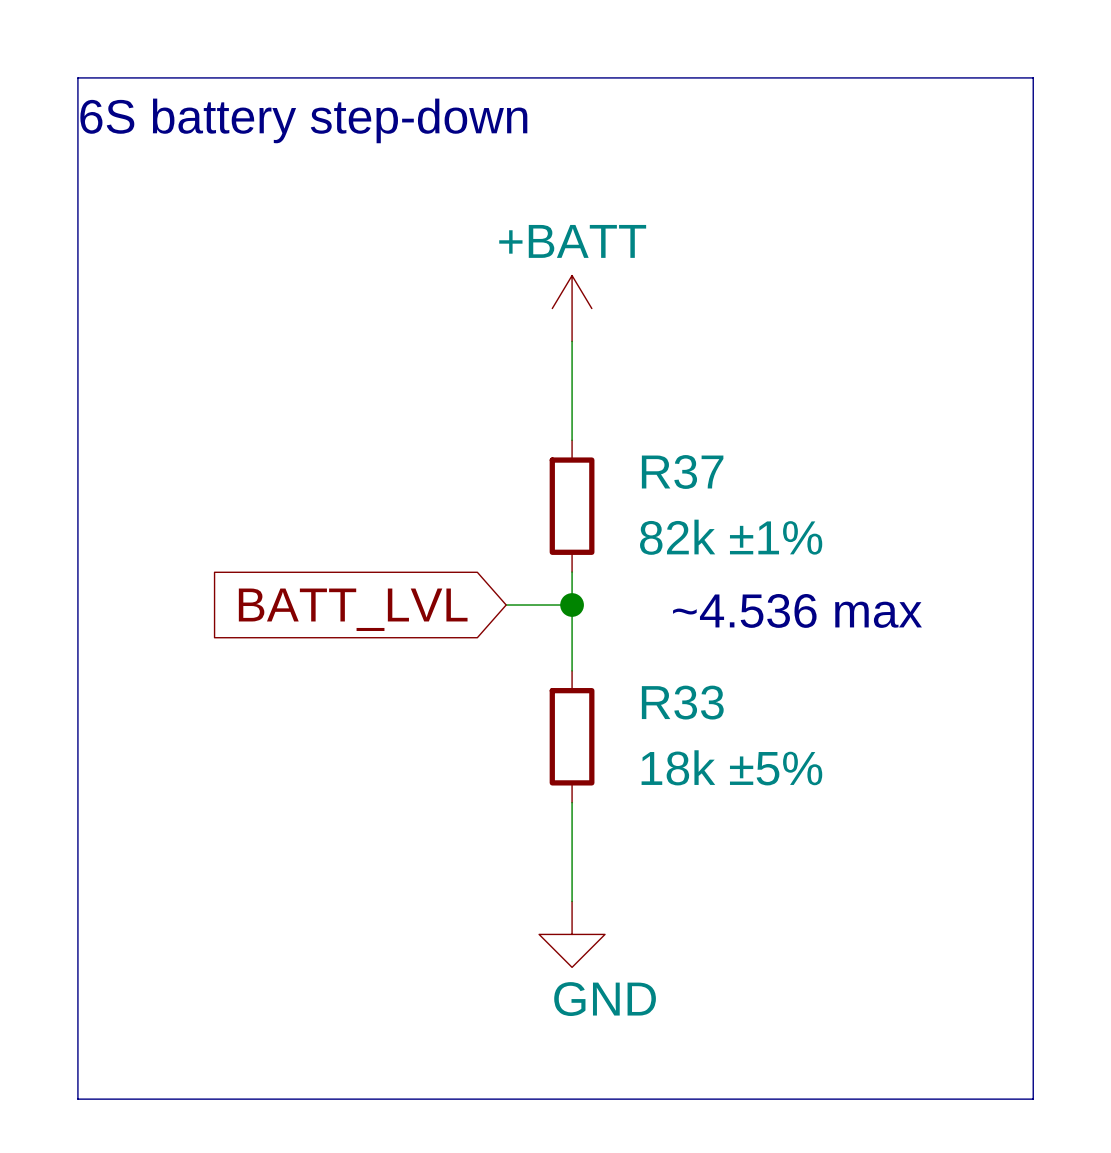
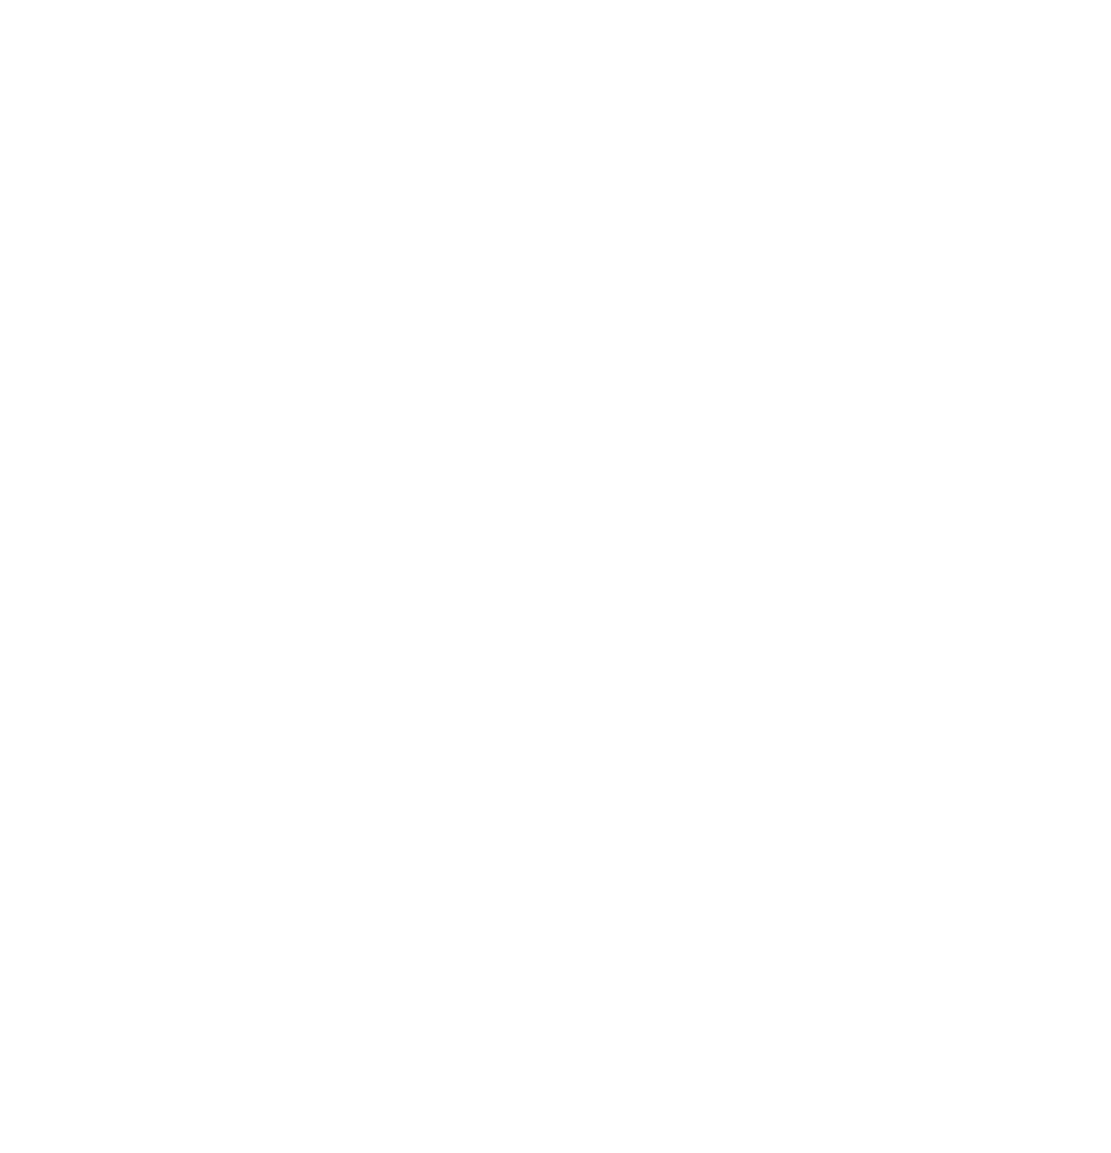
line: (77, 77) (1033, 77) (1033, 1099) (77, 1099) (77, 77) -> none
text: 6S battery step-down (303, 120) -> none
power symbol: +BATT (572, 308) -> none
wire: (572, 341) (572, 440) -> none
R37: 82k ±1% (572, 506) -> none
wire: (572, 572) (572, 670) -> none
wire: (506, 605) (572, 605) -> none
junction: (572, 605) -> none
global label: BATT_LVL (353, 609) -> none
text: ~4.536 max (797, 610) -> none
R33: 18k ±5% (572, 736) -> none
wire: (572, 802) (572, 901) -> none
power symbol: GND (572, 934) -> none

